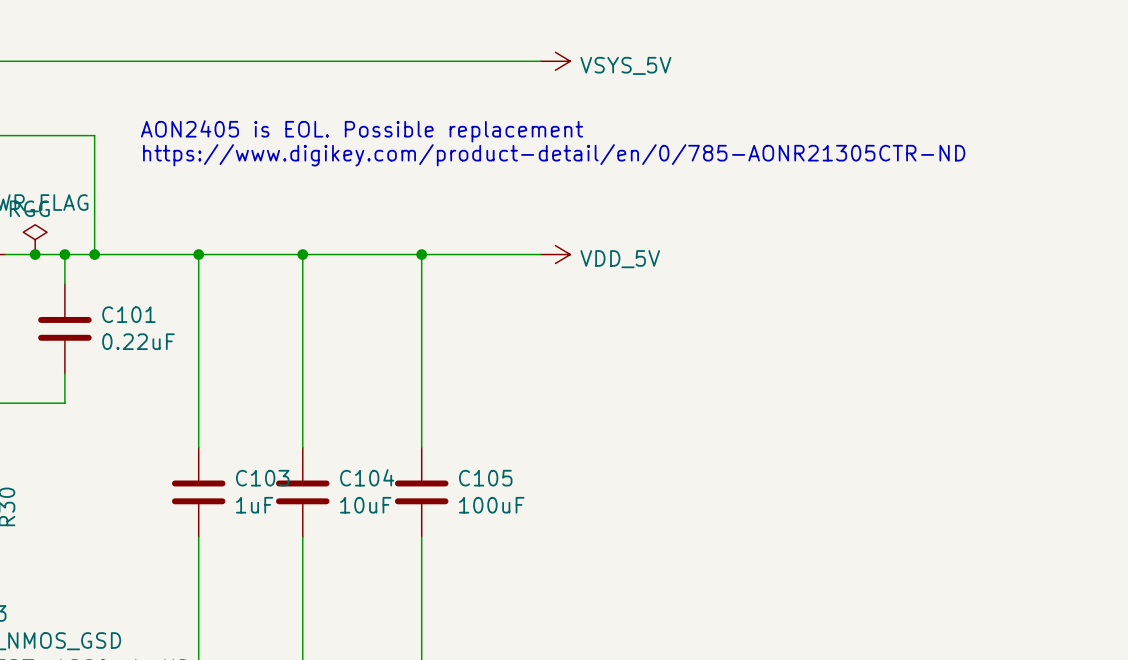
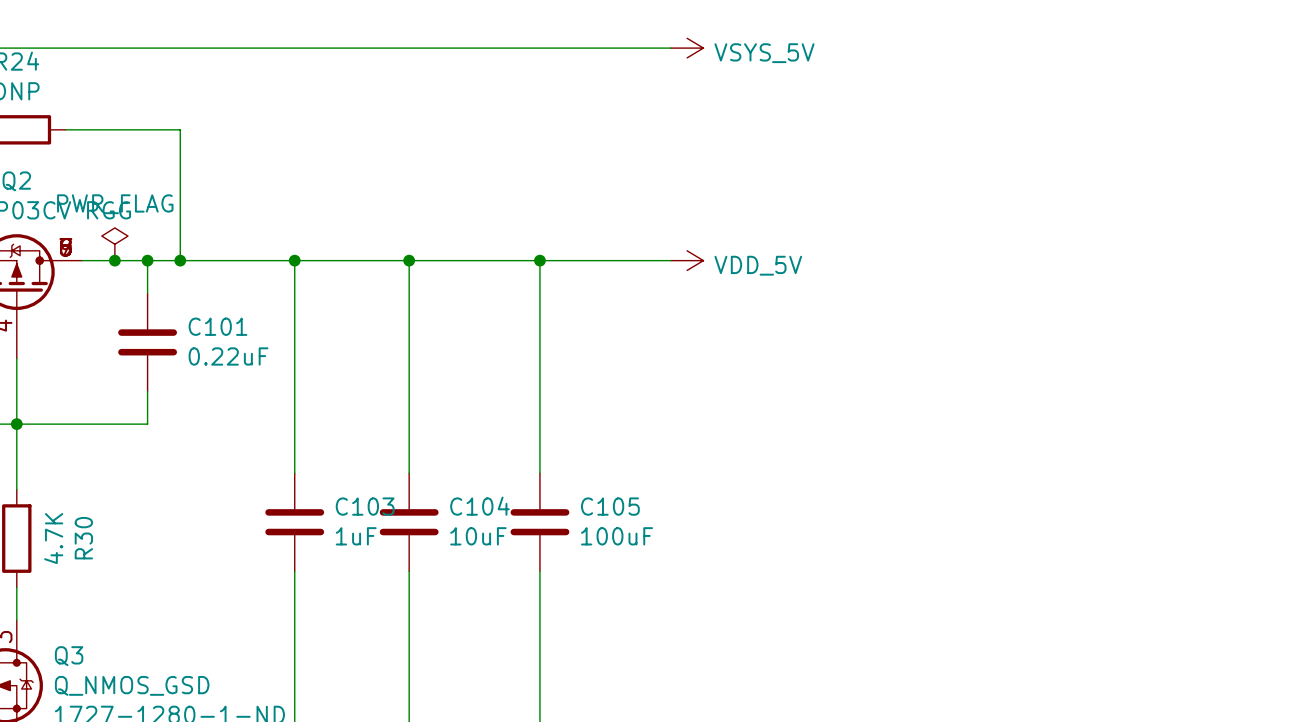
text: AON2405 is EOL. Possible replacement (361, 131) -> none
text: https://www.digikey.com/product-detail/en/0/785-AONR21305CTR-ND (554, 155) -> none

